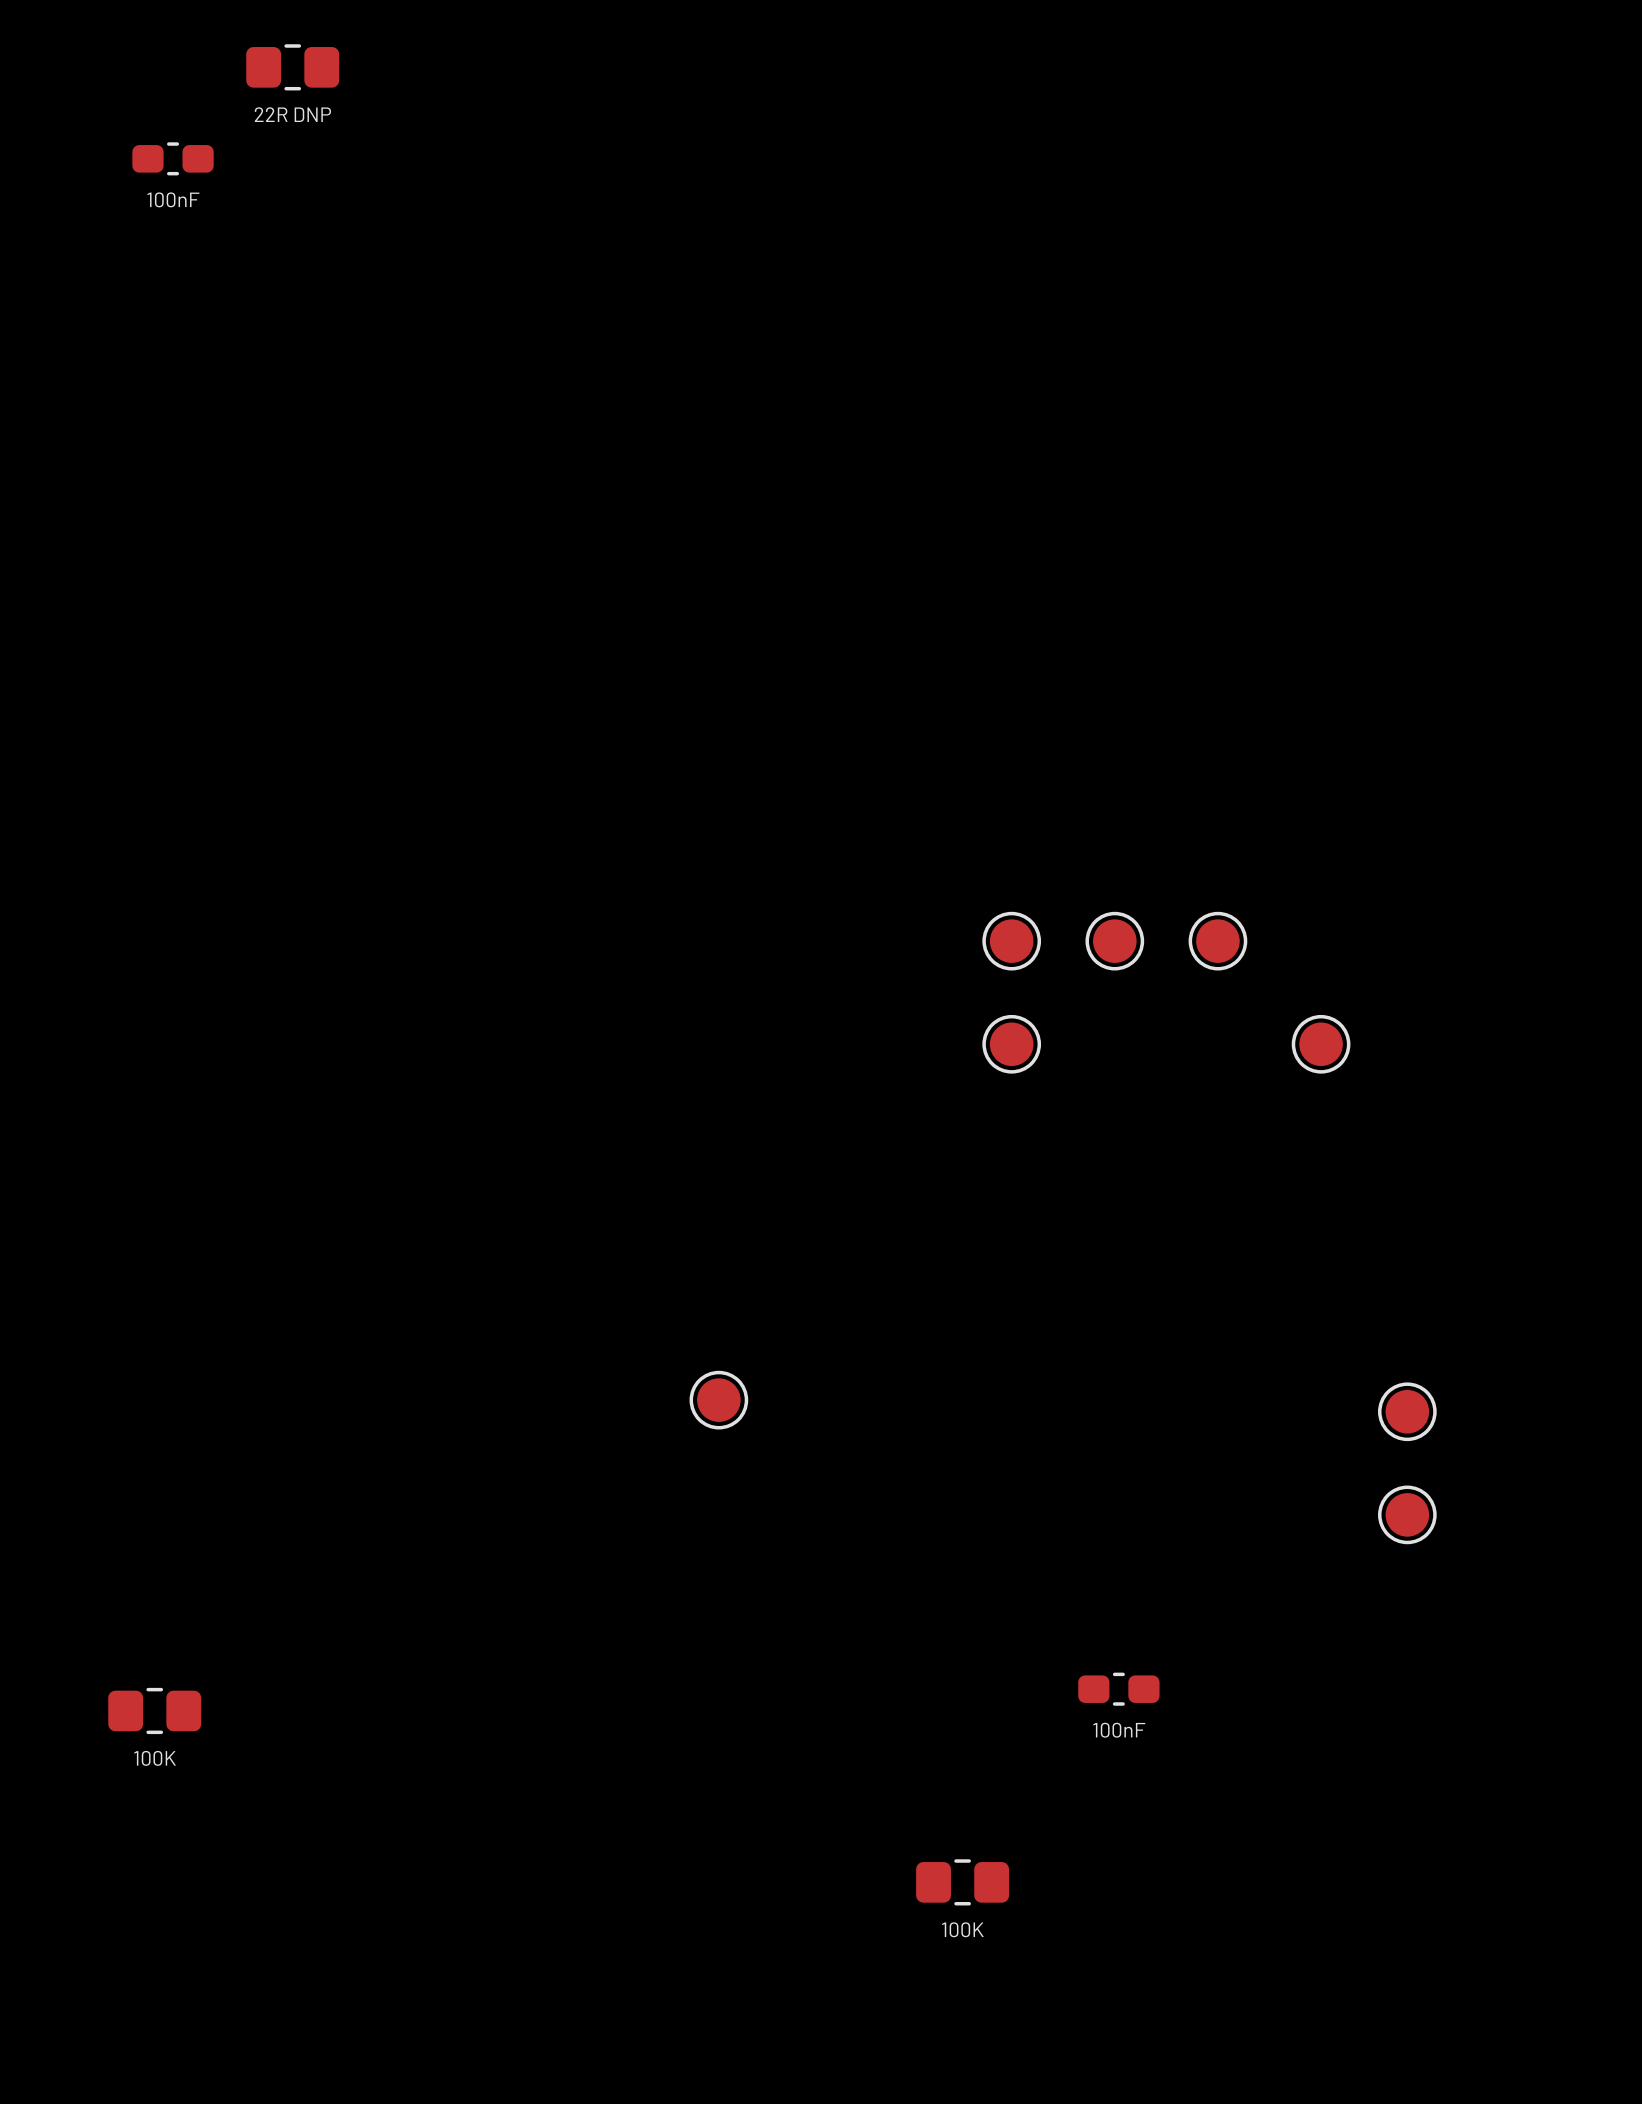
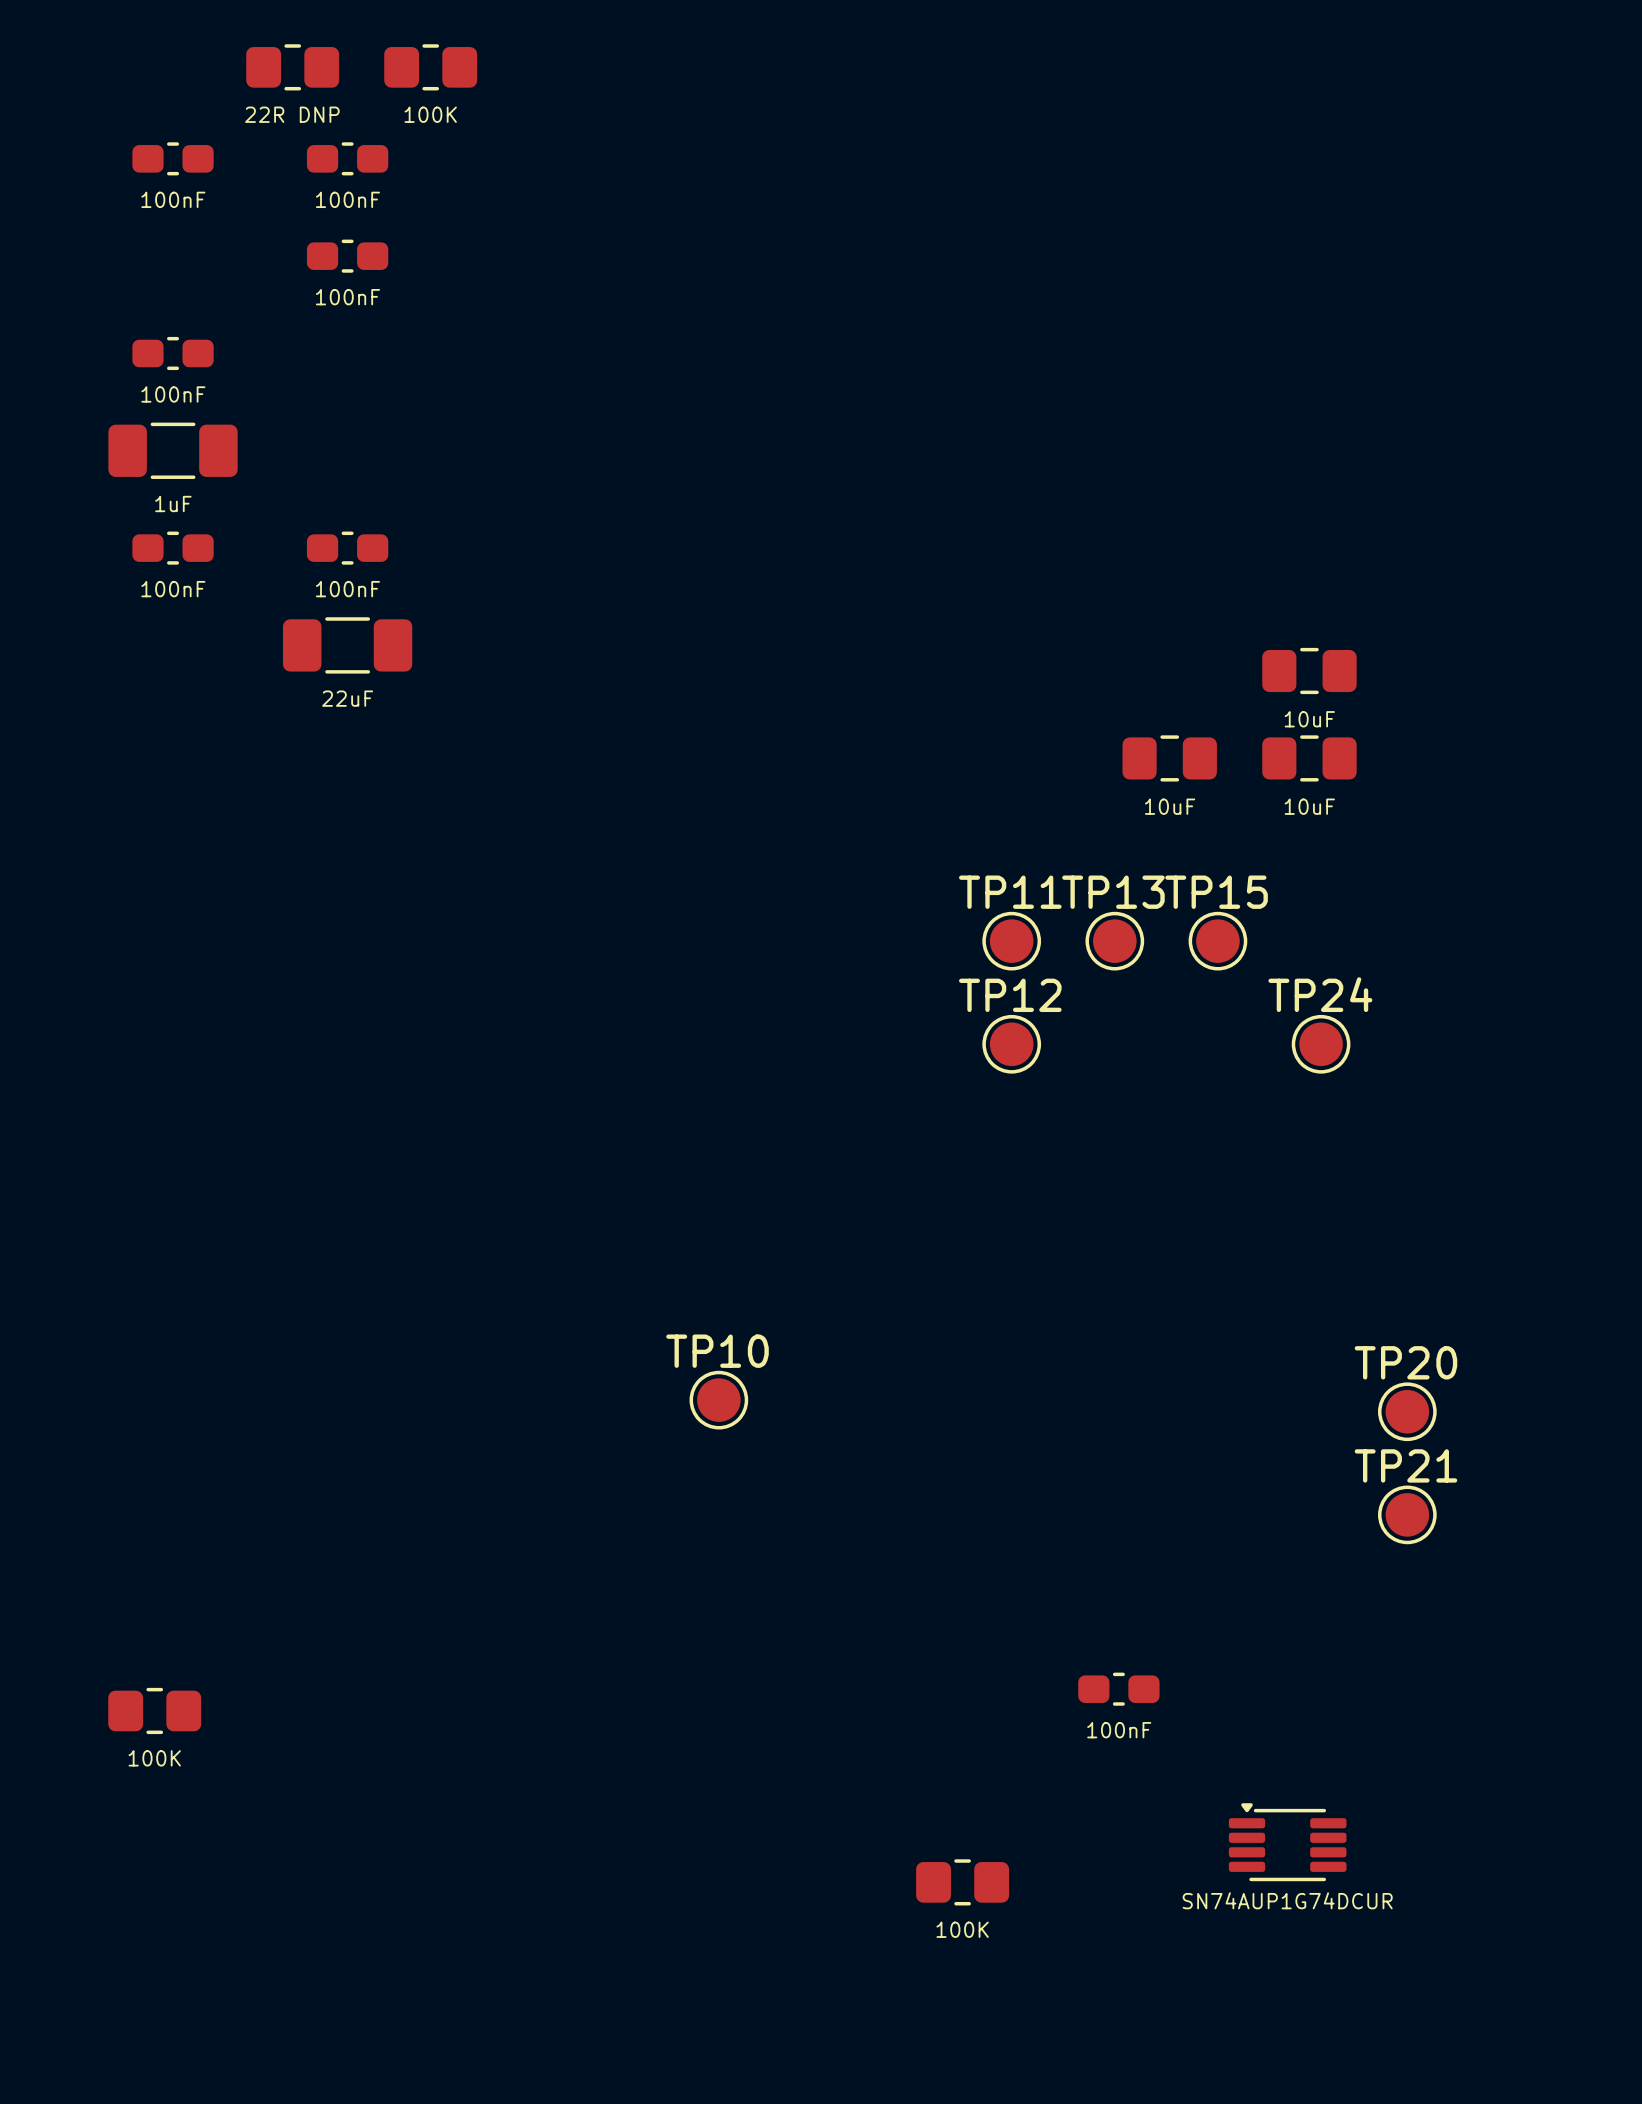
part: none -> 100K (430, 67)
part: none -> 100nF (347, 158)
part: none -> 100nF (347, 256)
part: none -> 100nF (173, 353)
part: none -> 1uF (173, 450)
part: none -> 100nF (173, 548)
part: none -> 100nF (347, 548)
part: none -> 22uF (347, 645)
part: none -> 10uF (1309, 670)
part: none -> 10uF (1169, 758)
part: none -> 10uF (1309, 758)
TP11 name: none -> TP11 (1010, 892)
TP13 name: none -> TP13 (1113, 892)
TP15 name: none -> TP15 (1216, 892)
TP12 name: none -> TP12 (1010, 995)
TP24 name: none -> TP24 (1320, 994)
TP10 name: none -> TP10 (717, 1351)
TP20 name: none -> TP20 (1405, 1362)
TP21 name: none -> TP21 (1405, 1465)
part: none -> SN74AUP1G74DCUR (1287, 1842)

